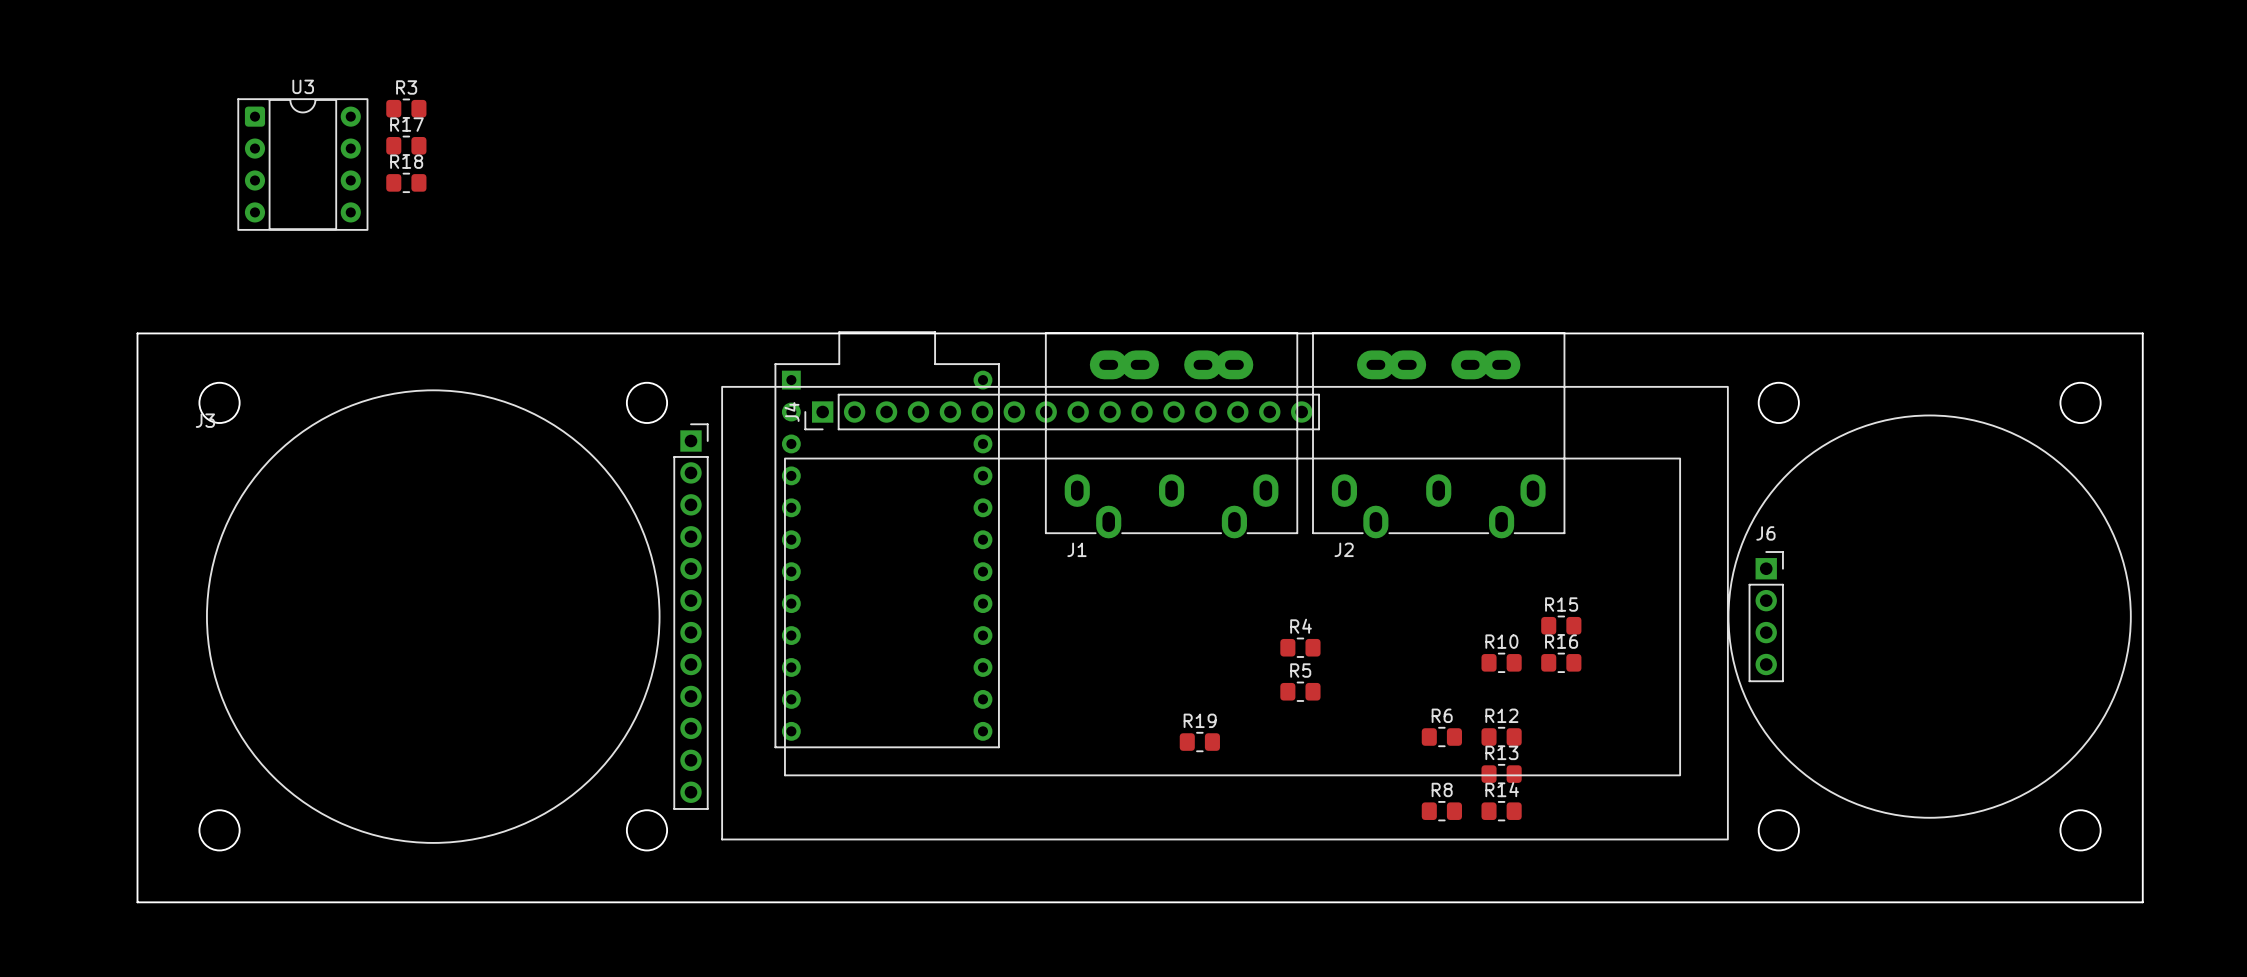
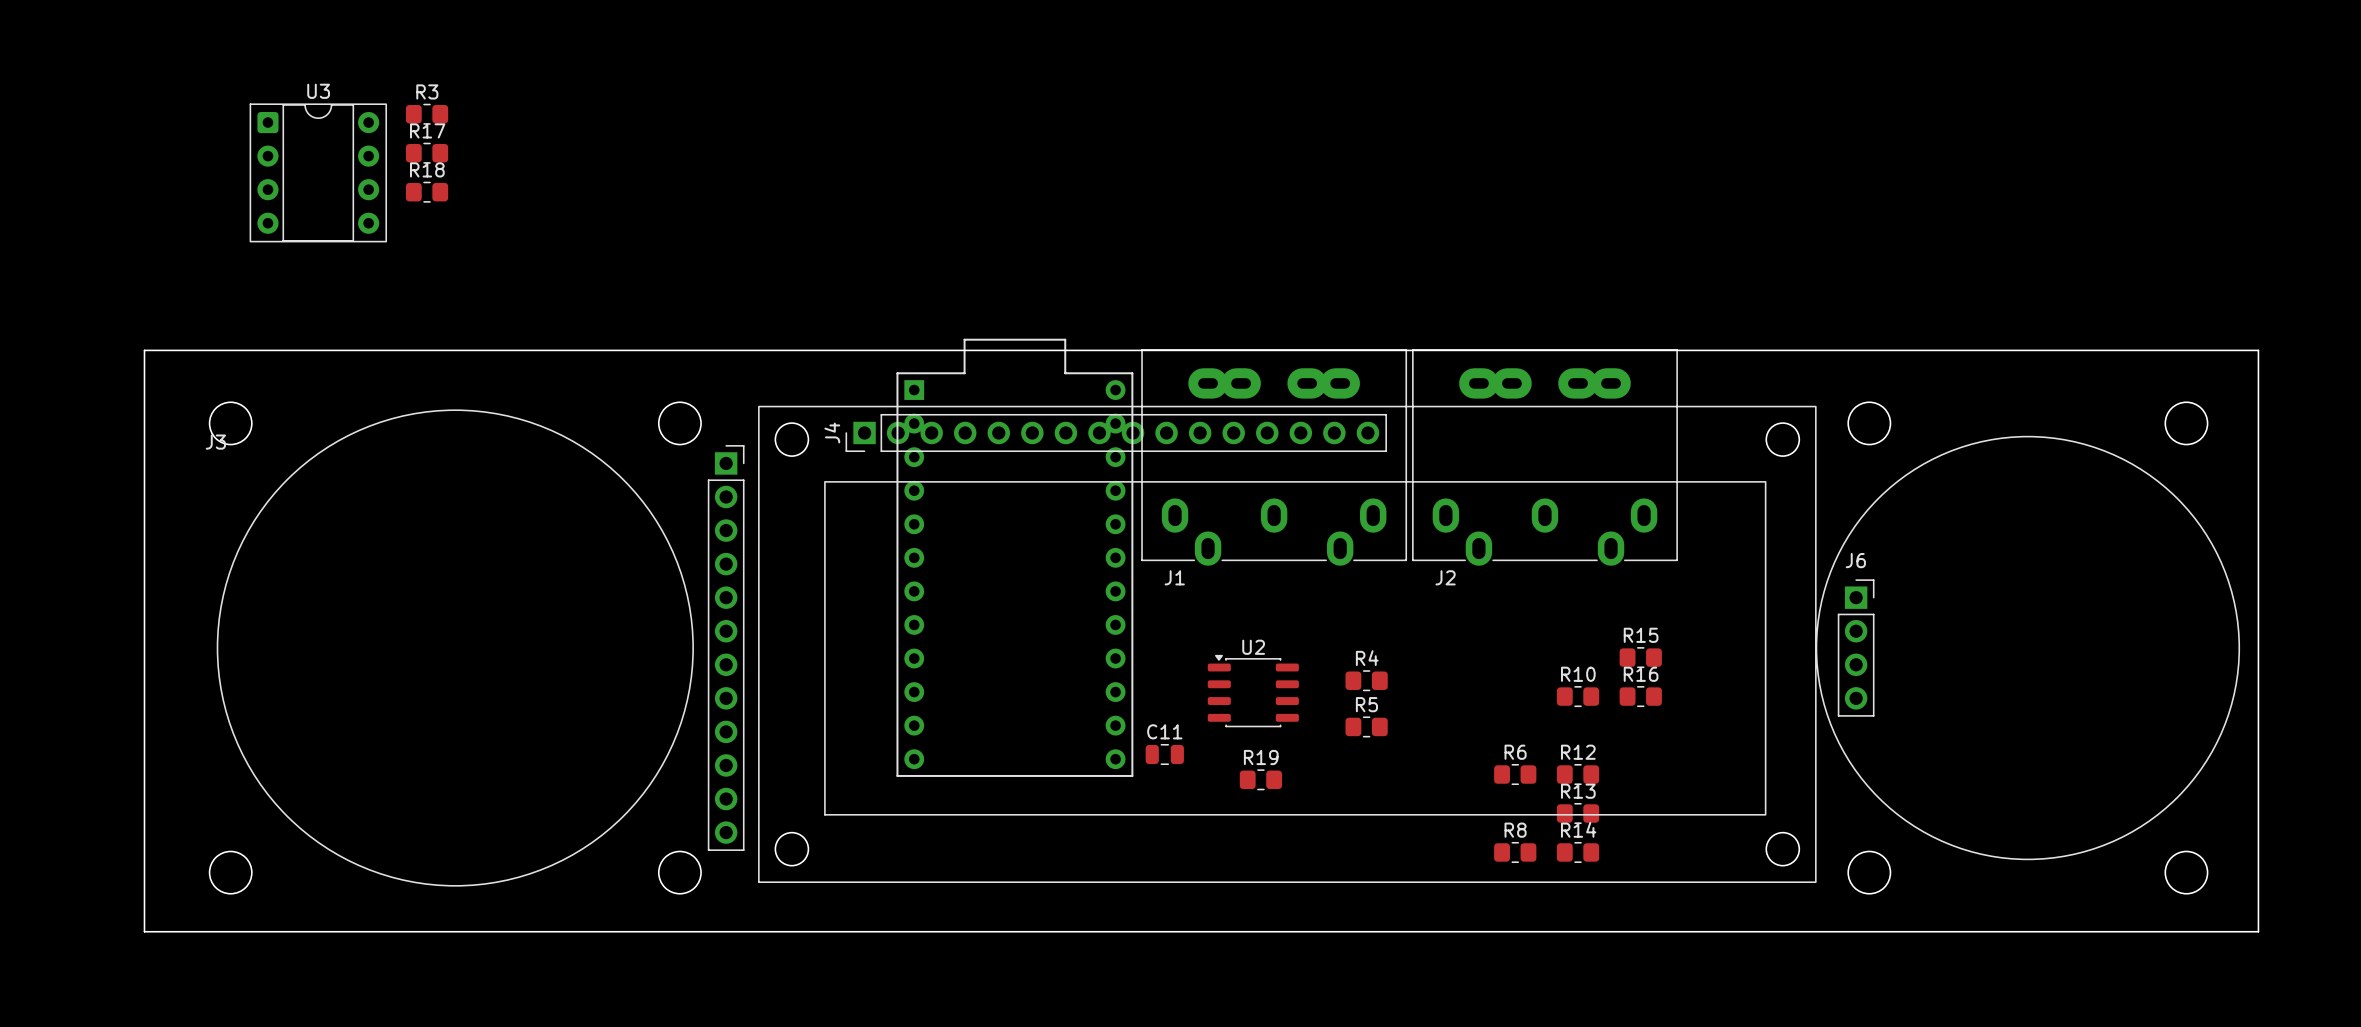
board edge: (2142, 333) (2142, 902) (137, 902) (137, 886) -> (2251, 350) (2258, 350) (2258, 931) (144, 931)
J4 footprint: [721, 386, 1729, 841] -> [758, 405, 1817, 883]
J1 position: (1171, 435) -> (1274, 457)
J2 position: (1438, 435) -> (1544, 457)
part position: (887, 539) -> (1014, 557)
U2: none -> (1253, 691)
C11: none -> (1164, 754)

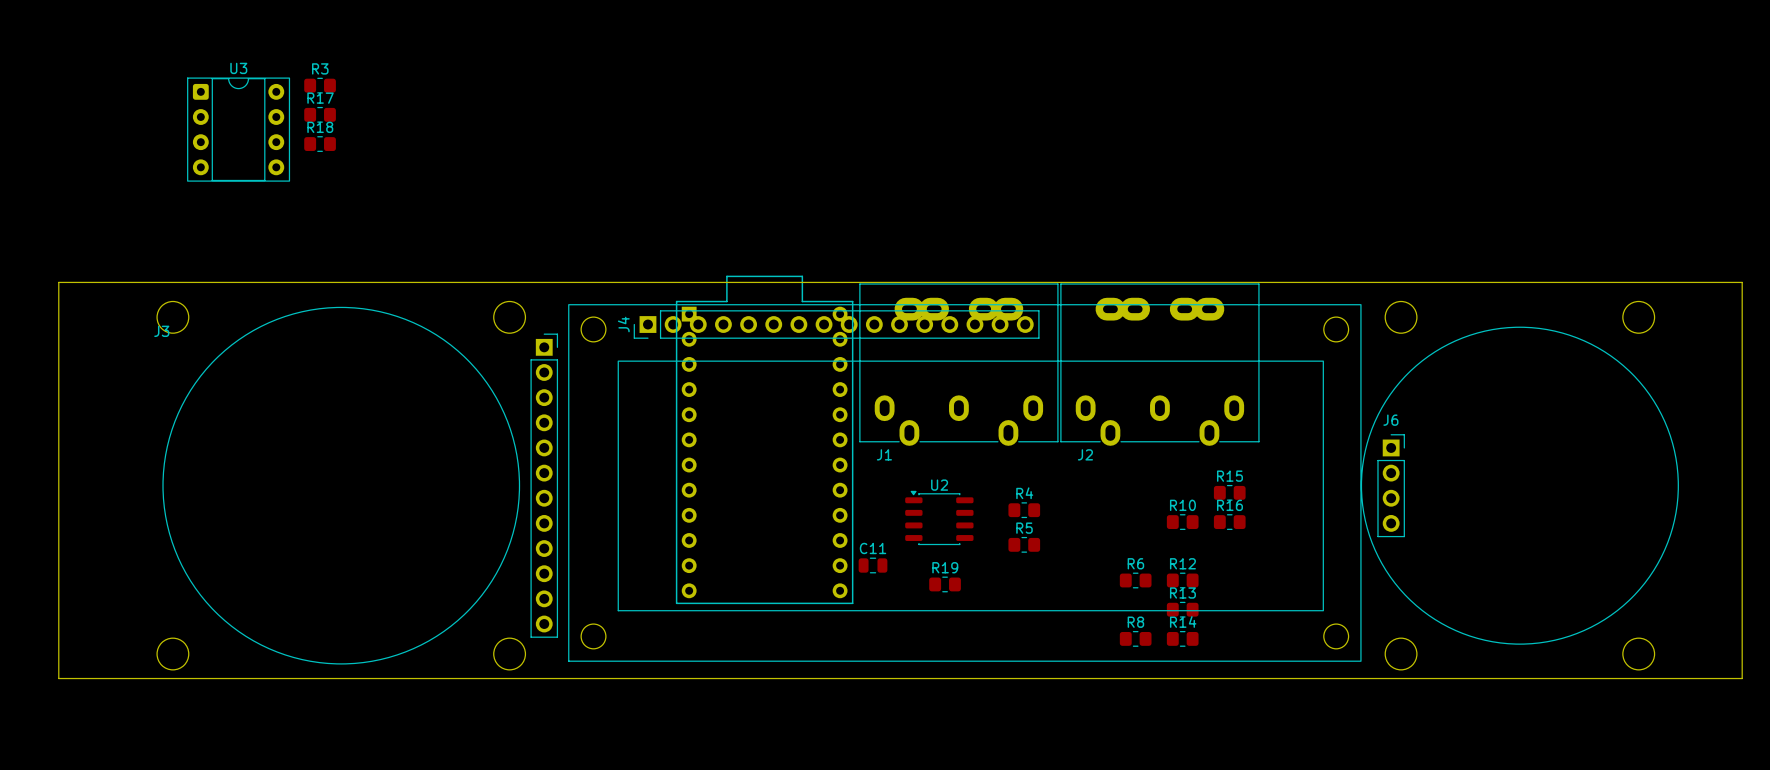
board edge: (144, 350) (2258, 350) (2258, 931) (144, 931) (144, 350) -> (58, 282) (58, 678) (1742, 678) (1742, 282) (58, 282)
J1 position: (1274, 457) -> (958, 364)
J2 position: (1544, 457) -> (1159, 364)
part position: (1014, 557) -> (764, 439)

